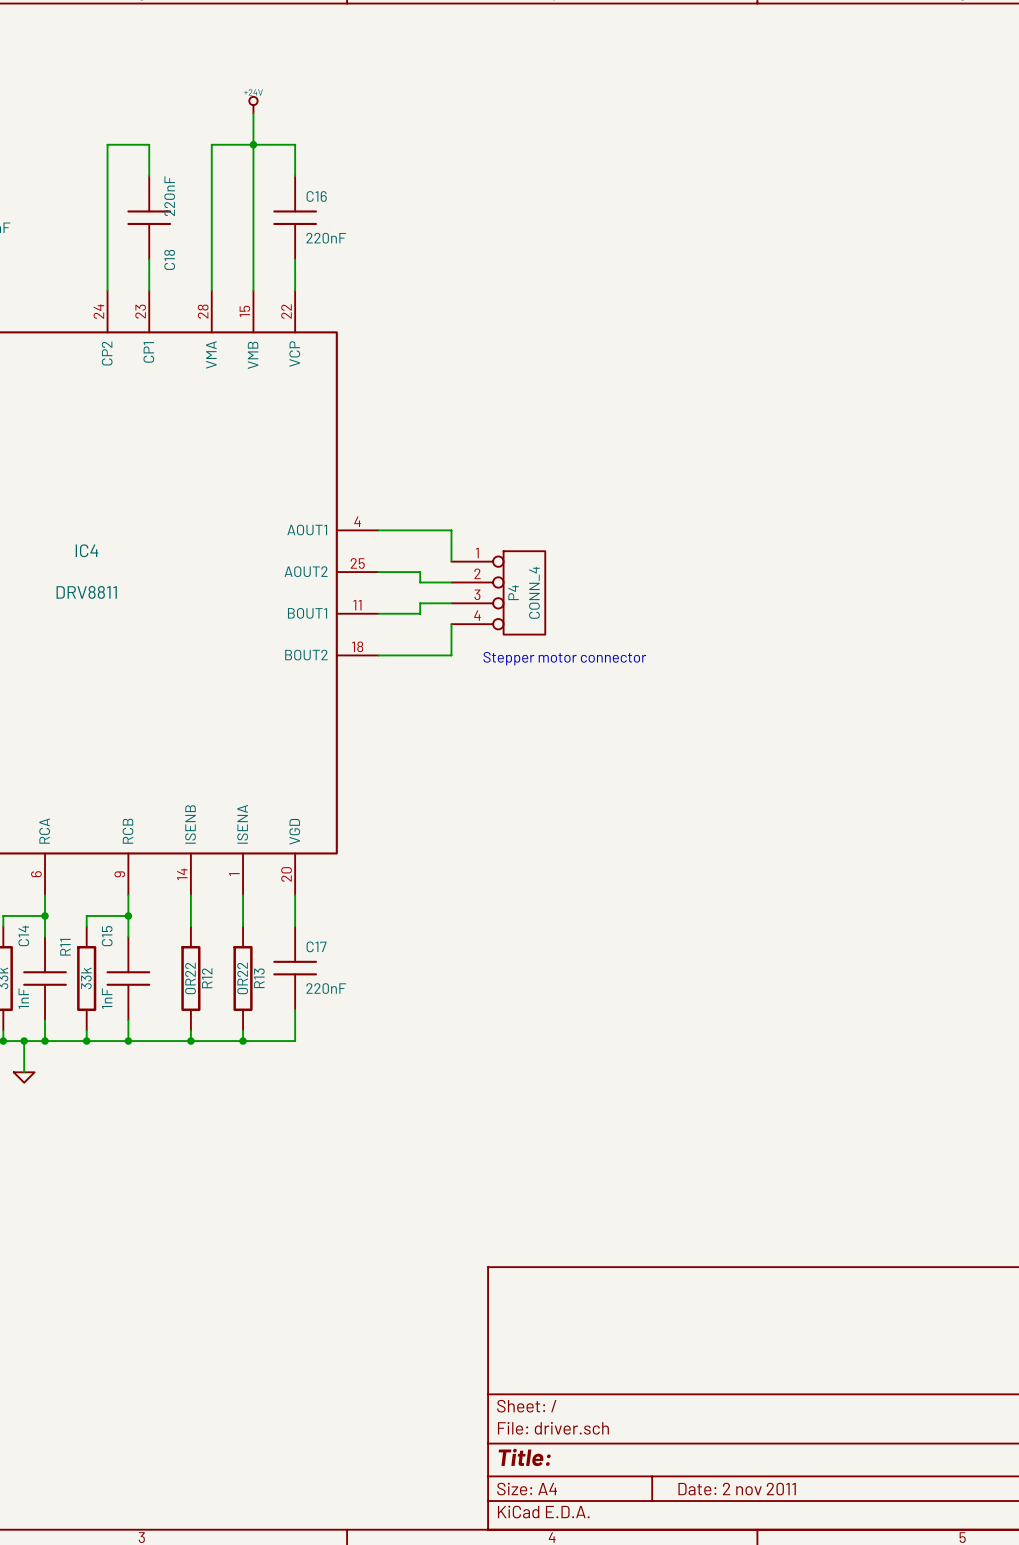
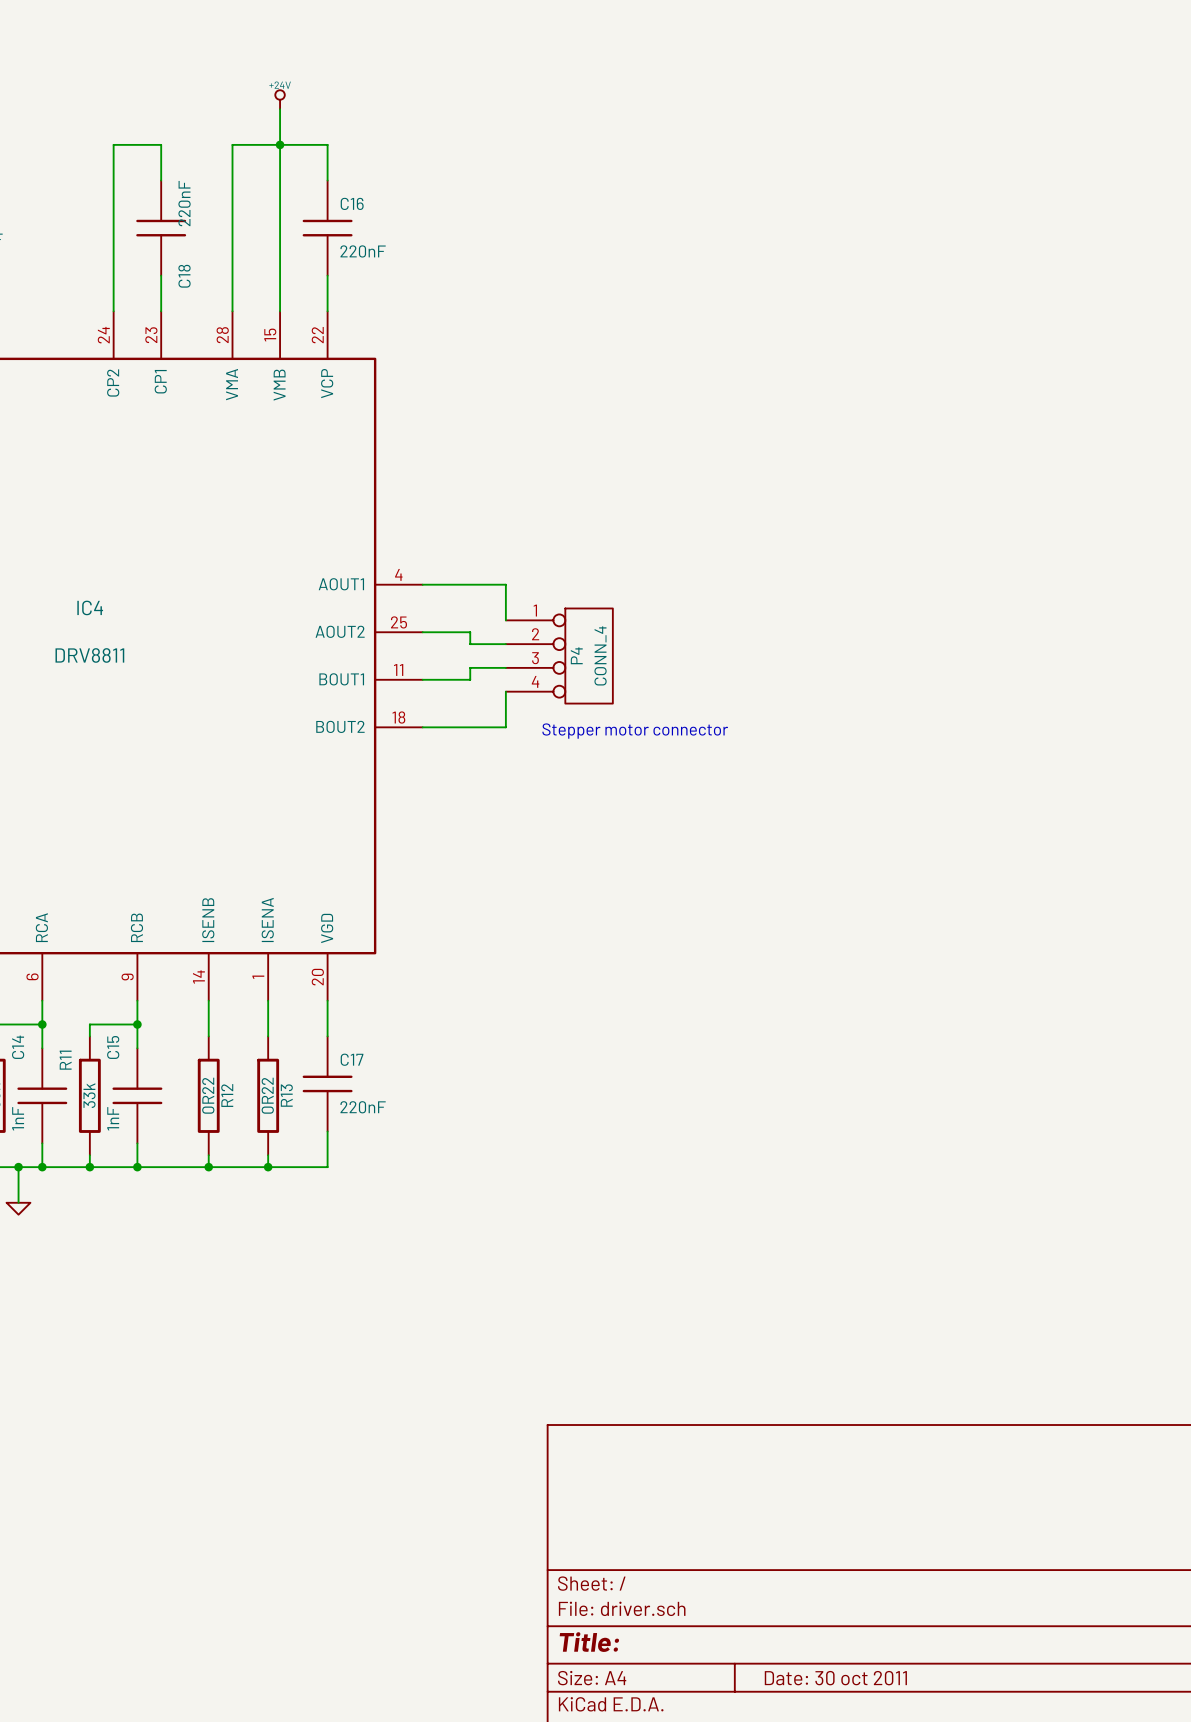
title block: Date: 2 nov 2011 (737, 1489) -> Date: 30 oct 2011 (835, 1678)

